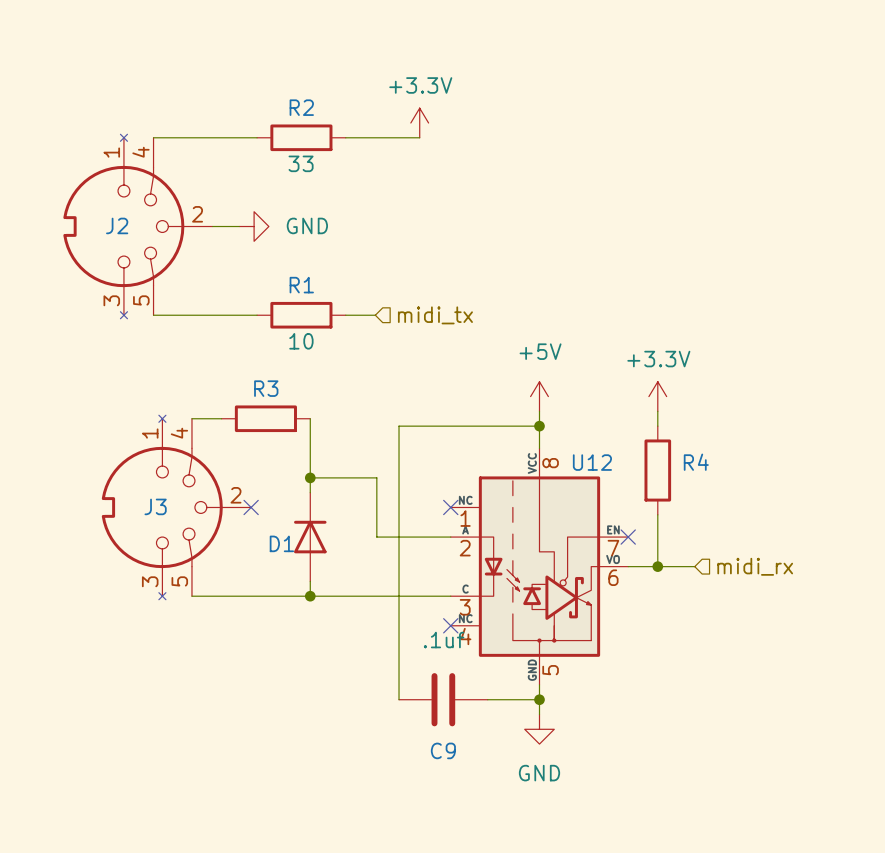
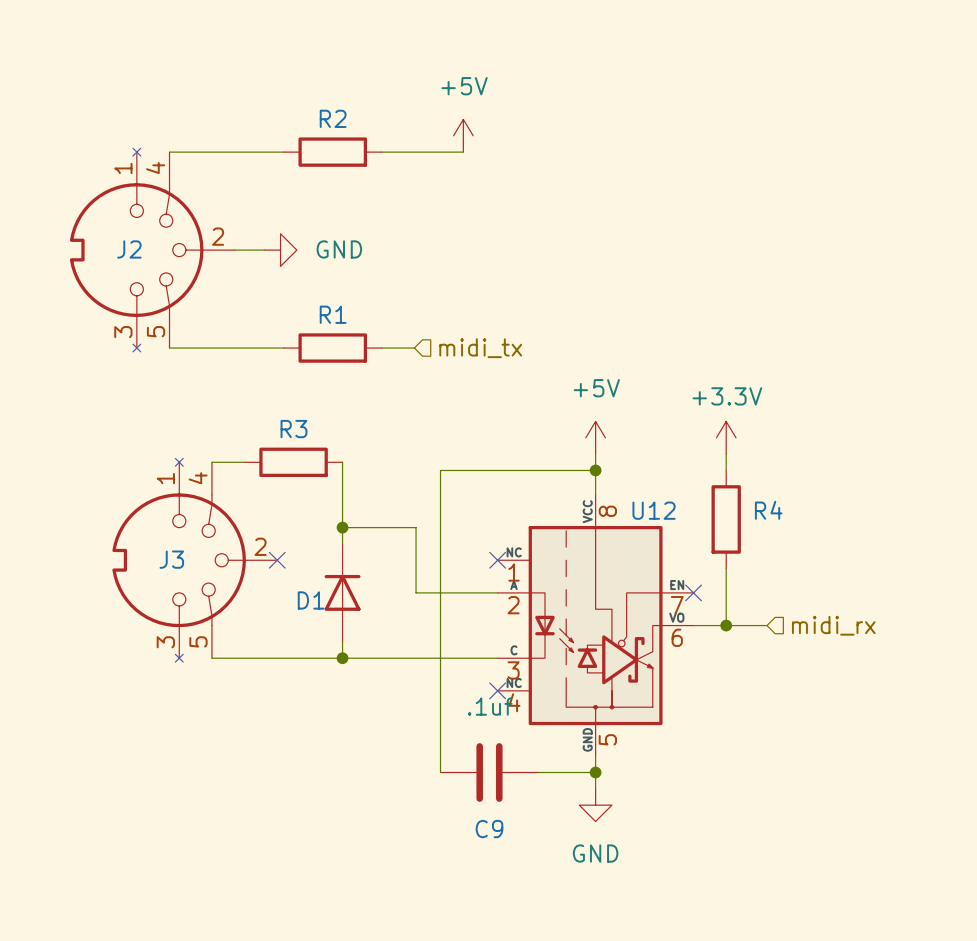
power symbol: +3.3V (419, 123) -> +5V (463, 135)
R2 value: 33 (301, 163) -> none
R1 value: 10 (301, 341) -> none

